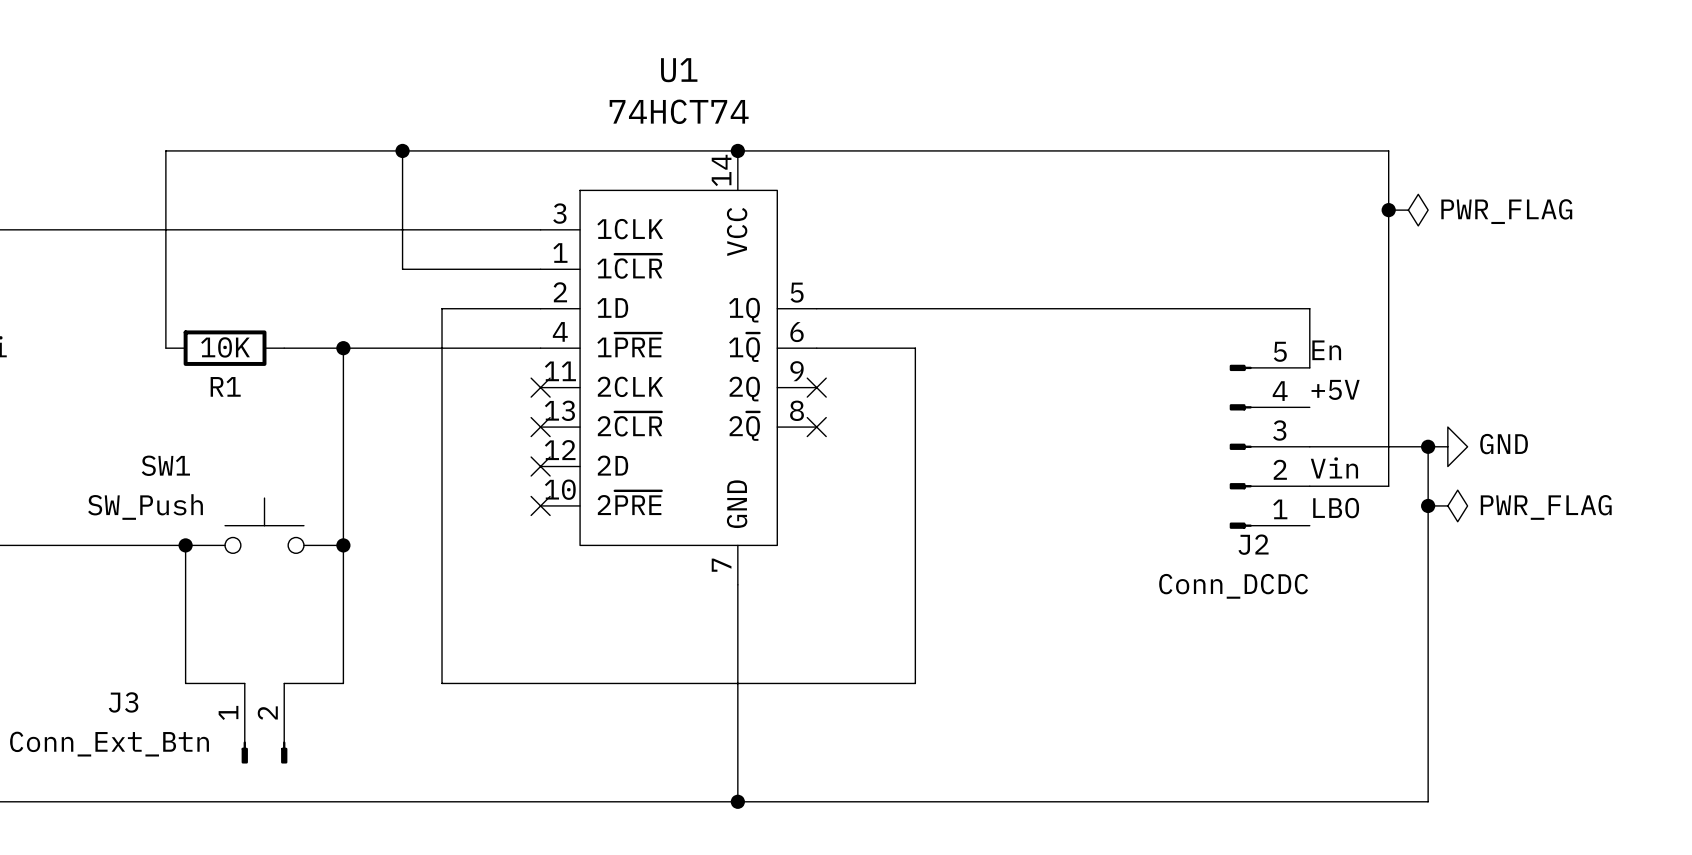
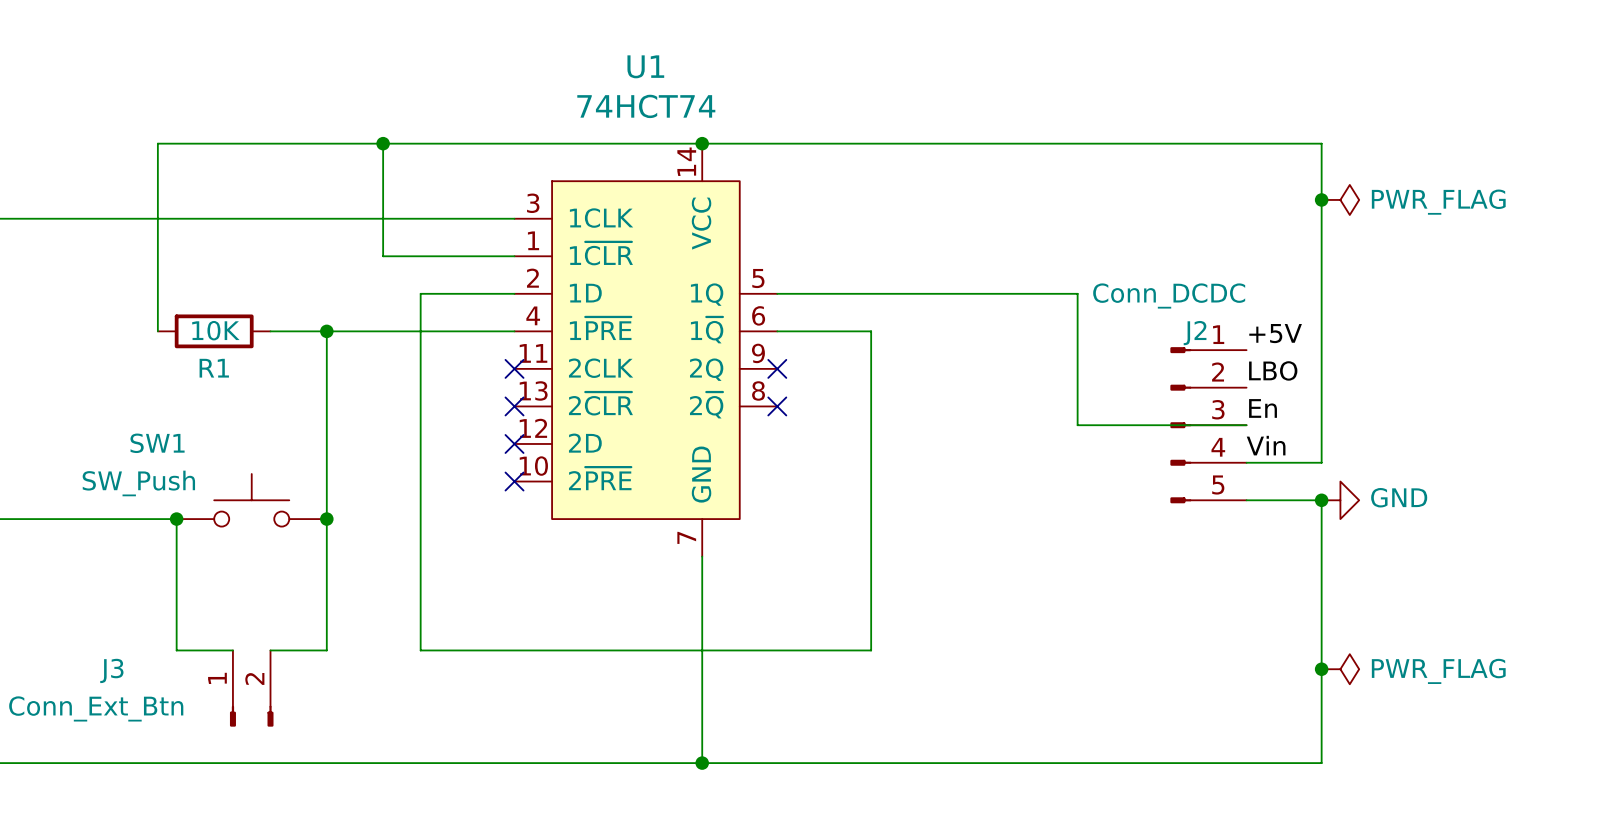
wire: (1132, 308) (1309, 308) (1309, 367) -> (1077, 293) (1077, 425) (1246, 425)
label: En (1326, 350) -> +5V (1275, 333)
label: +5V (1335, 389) -> LBO (1273, 370)
label: none -> En (1263, 408)
J2 flip: as is (1240, 446) -> up-down (1180, 425)
wire: (1309, 446) (1428, 446) (1428, 801) (1388, 801) -> (1246, 500) (1321, 500) (1321, 763)
junction: (1428, 446) -> none
power symbol position: GND (1447, 446) -> GND (1340, 500)
junction: (1428, 505) -> none
power symbol position: PWR_FLAG (1447, 505) -> PWR_FLAG (1340, 669)
label: LBO (1336, 508) -> none
junction: none -> (1321, 500)
junction: none -> (1321, 669)

